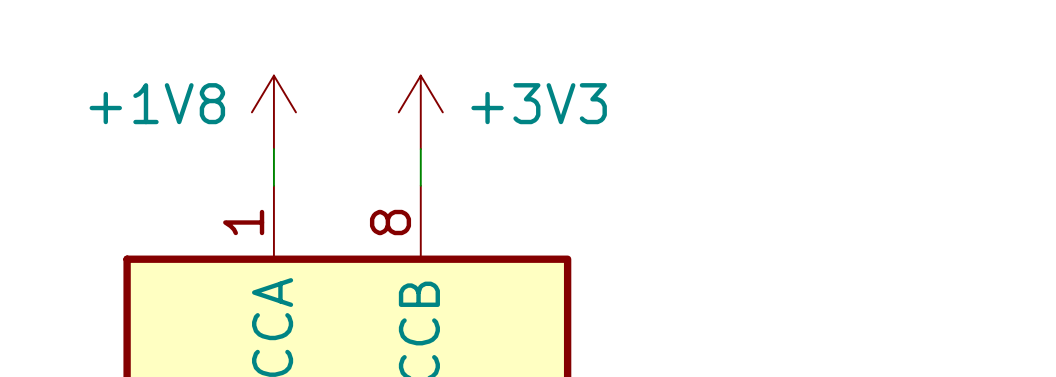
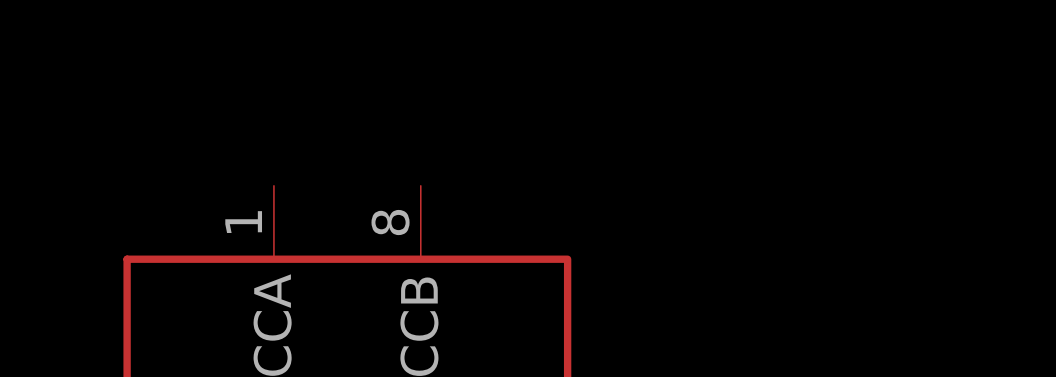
power symbol: +1V8 (273, 112) -> none
power symbol: +3V3 (420, 112) -> none
wire: (273, 149) (273, 185) -> none
wire: (420, 149) (420, 185) -> none

